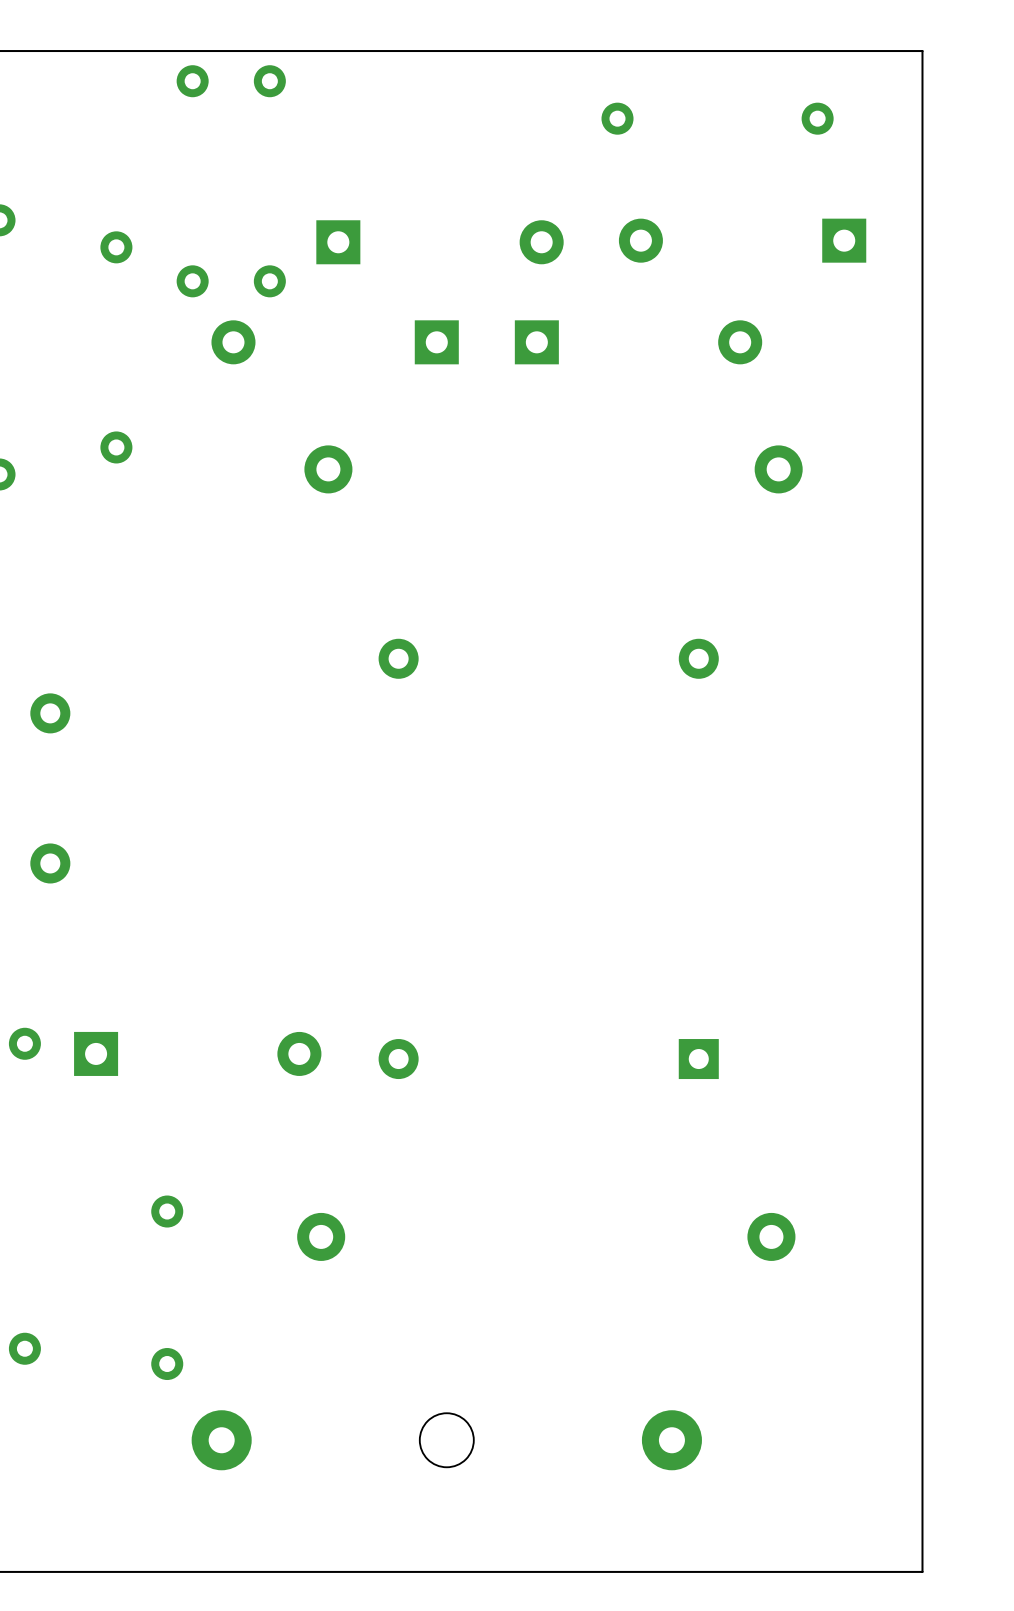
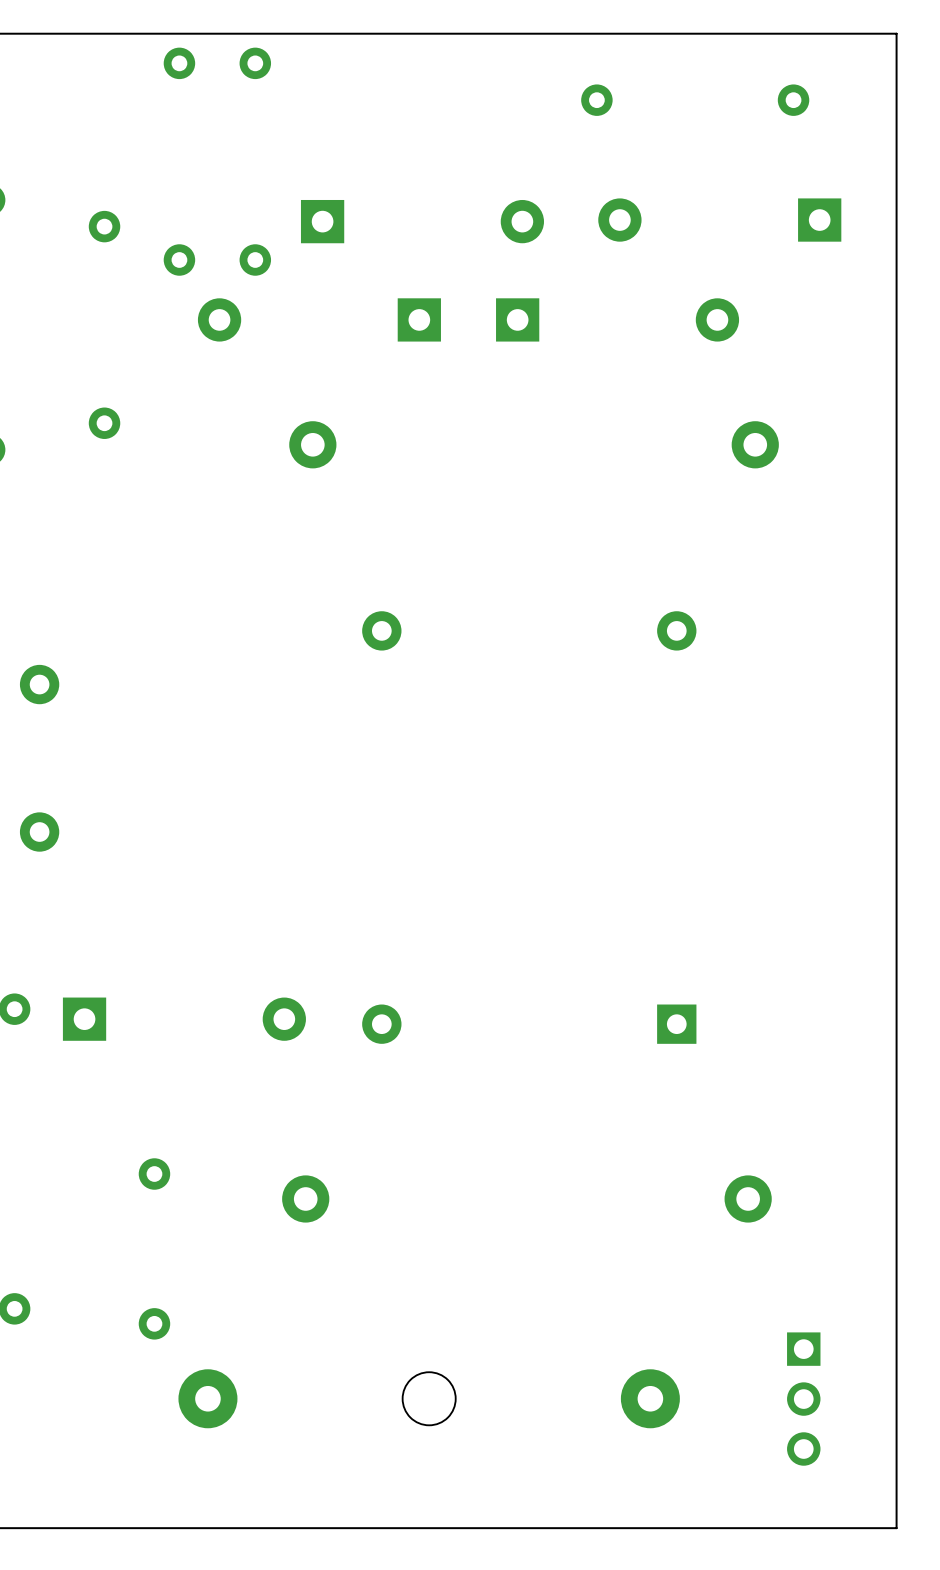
part: none -> (803, 1399)

